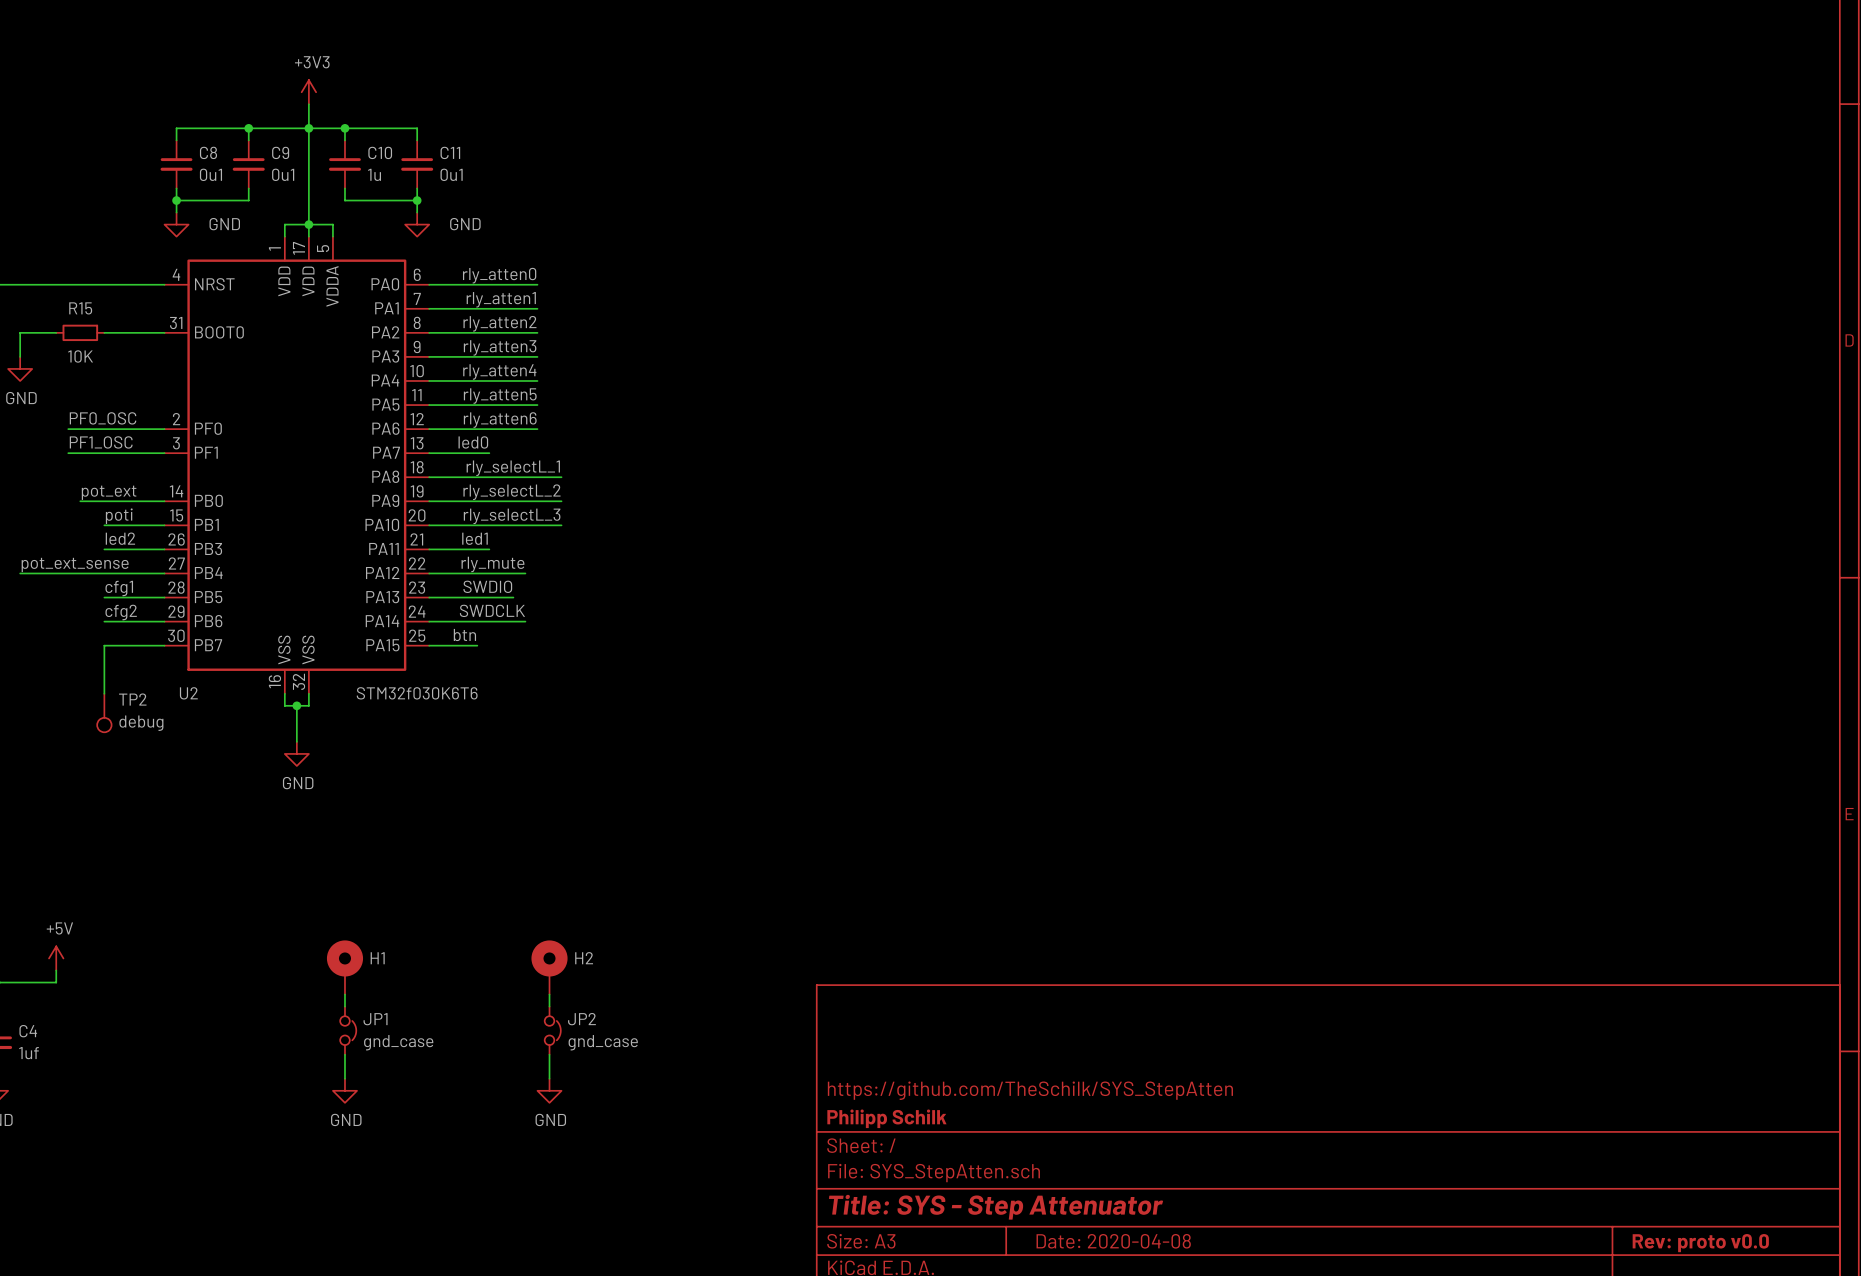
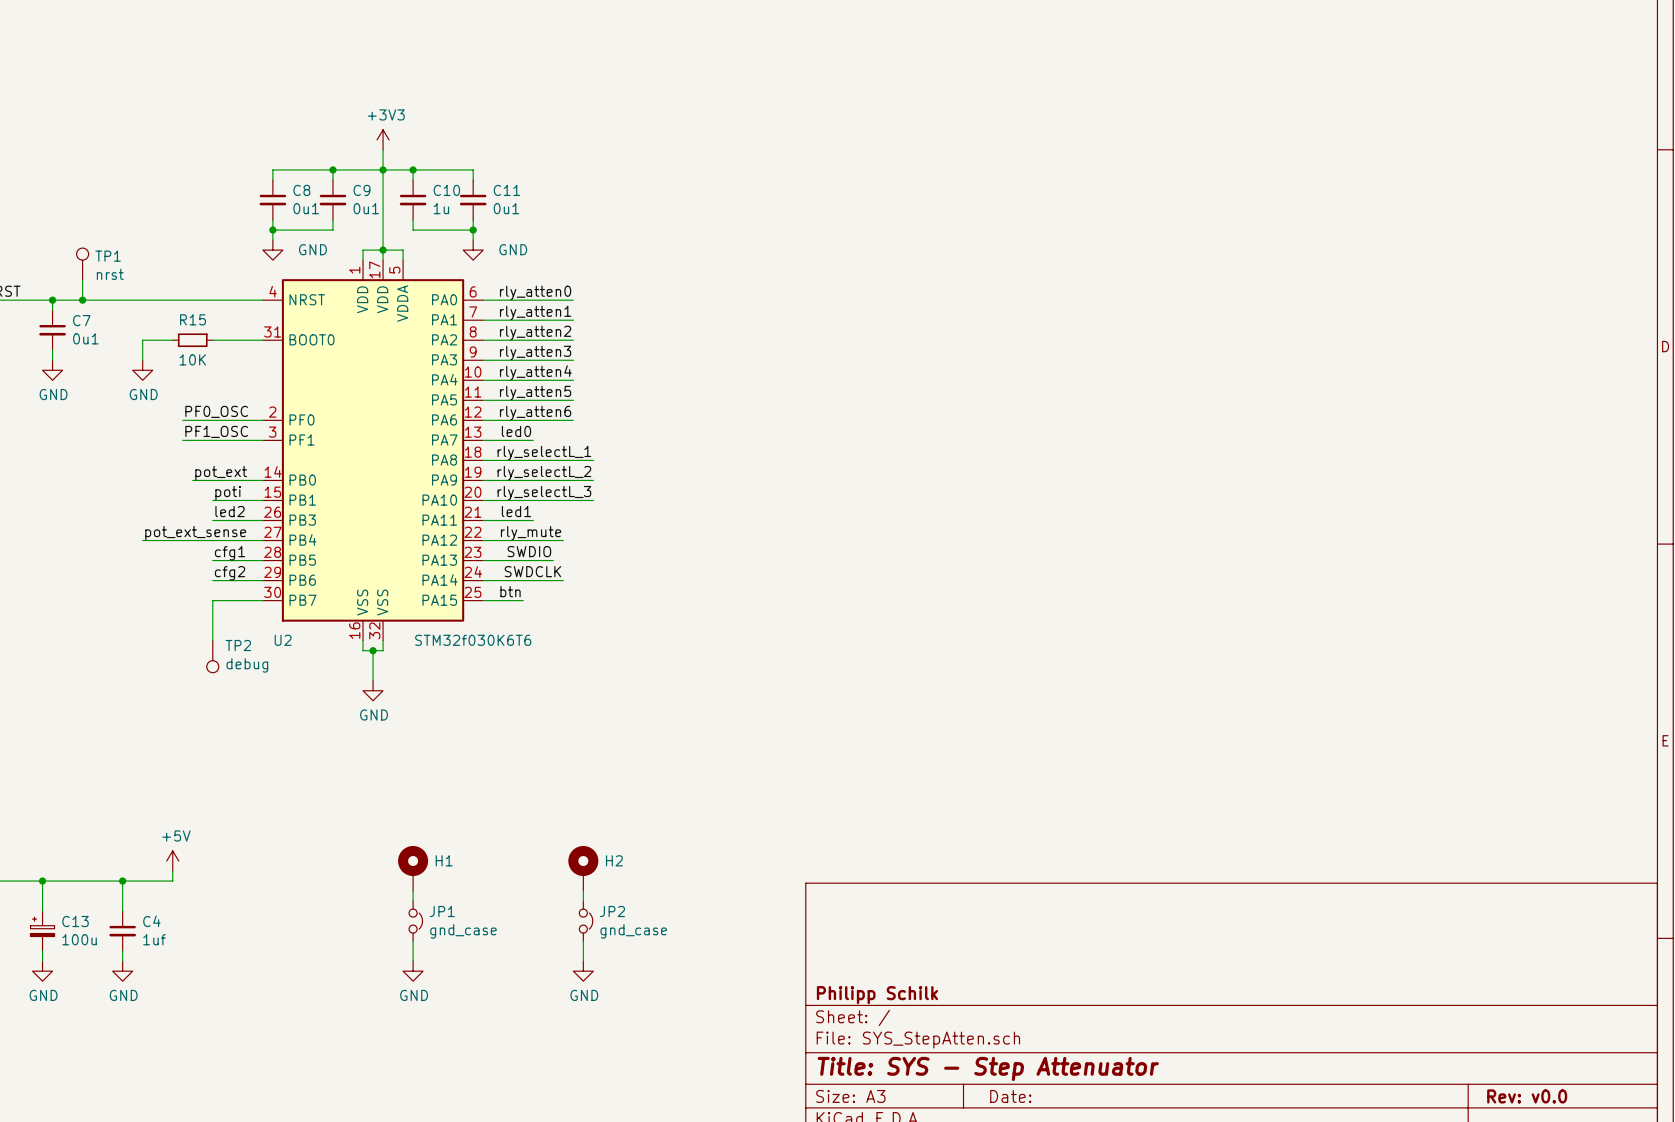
title block: https://github.com/TheSchilk/SYS_StepAtten (1030, 1090) -> none
title block: Date: 2020-04-08 (1113, 1241) -> Date: (1010, 1096)
title block: Rev: proto v0.0 (1700, 1243) -> Rev: v0.0 (1527, 1096)

